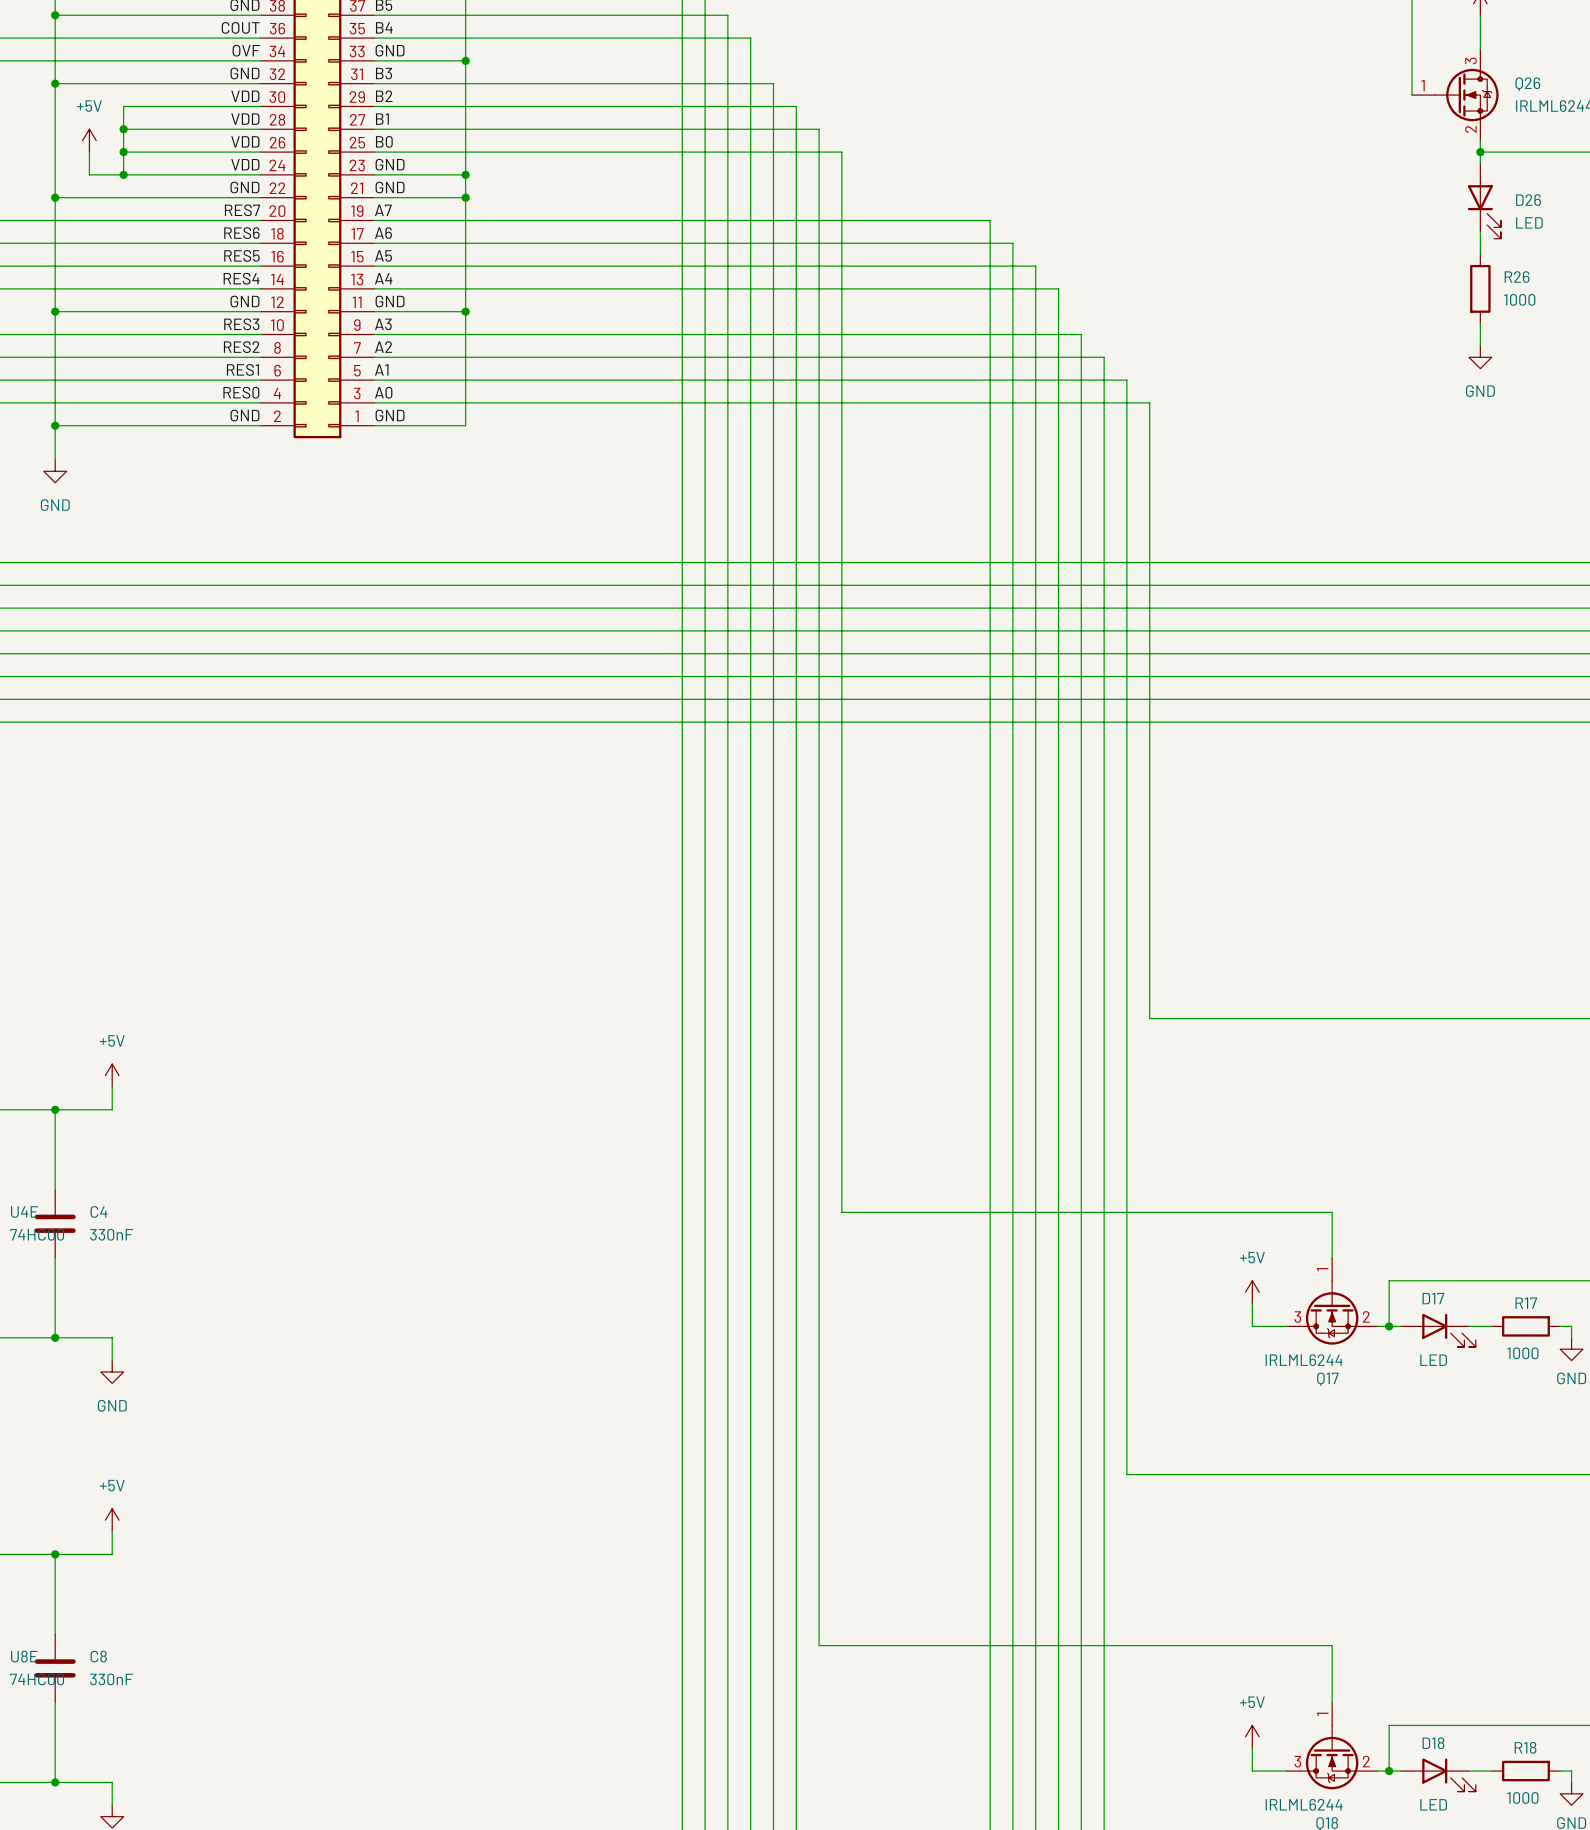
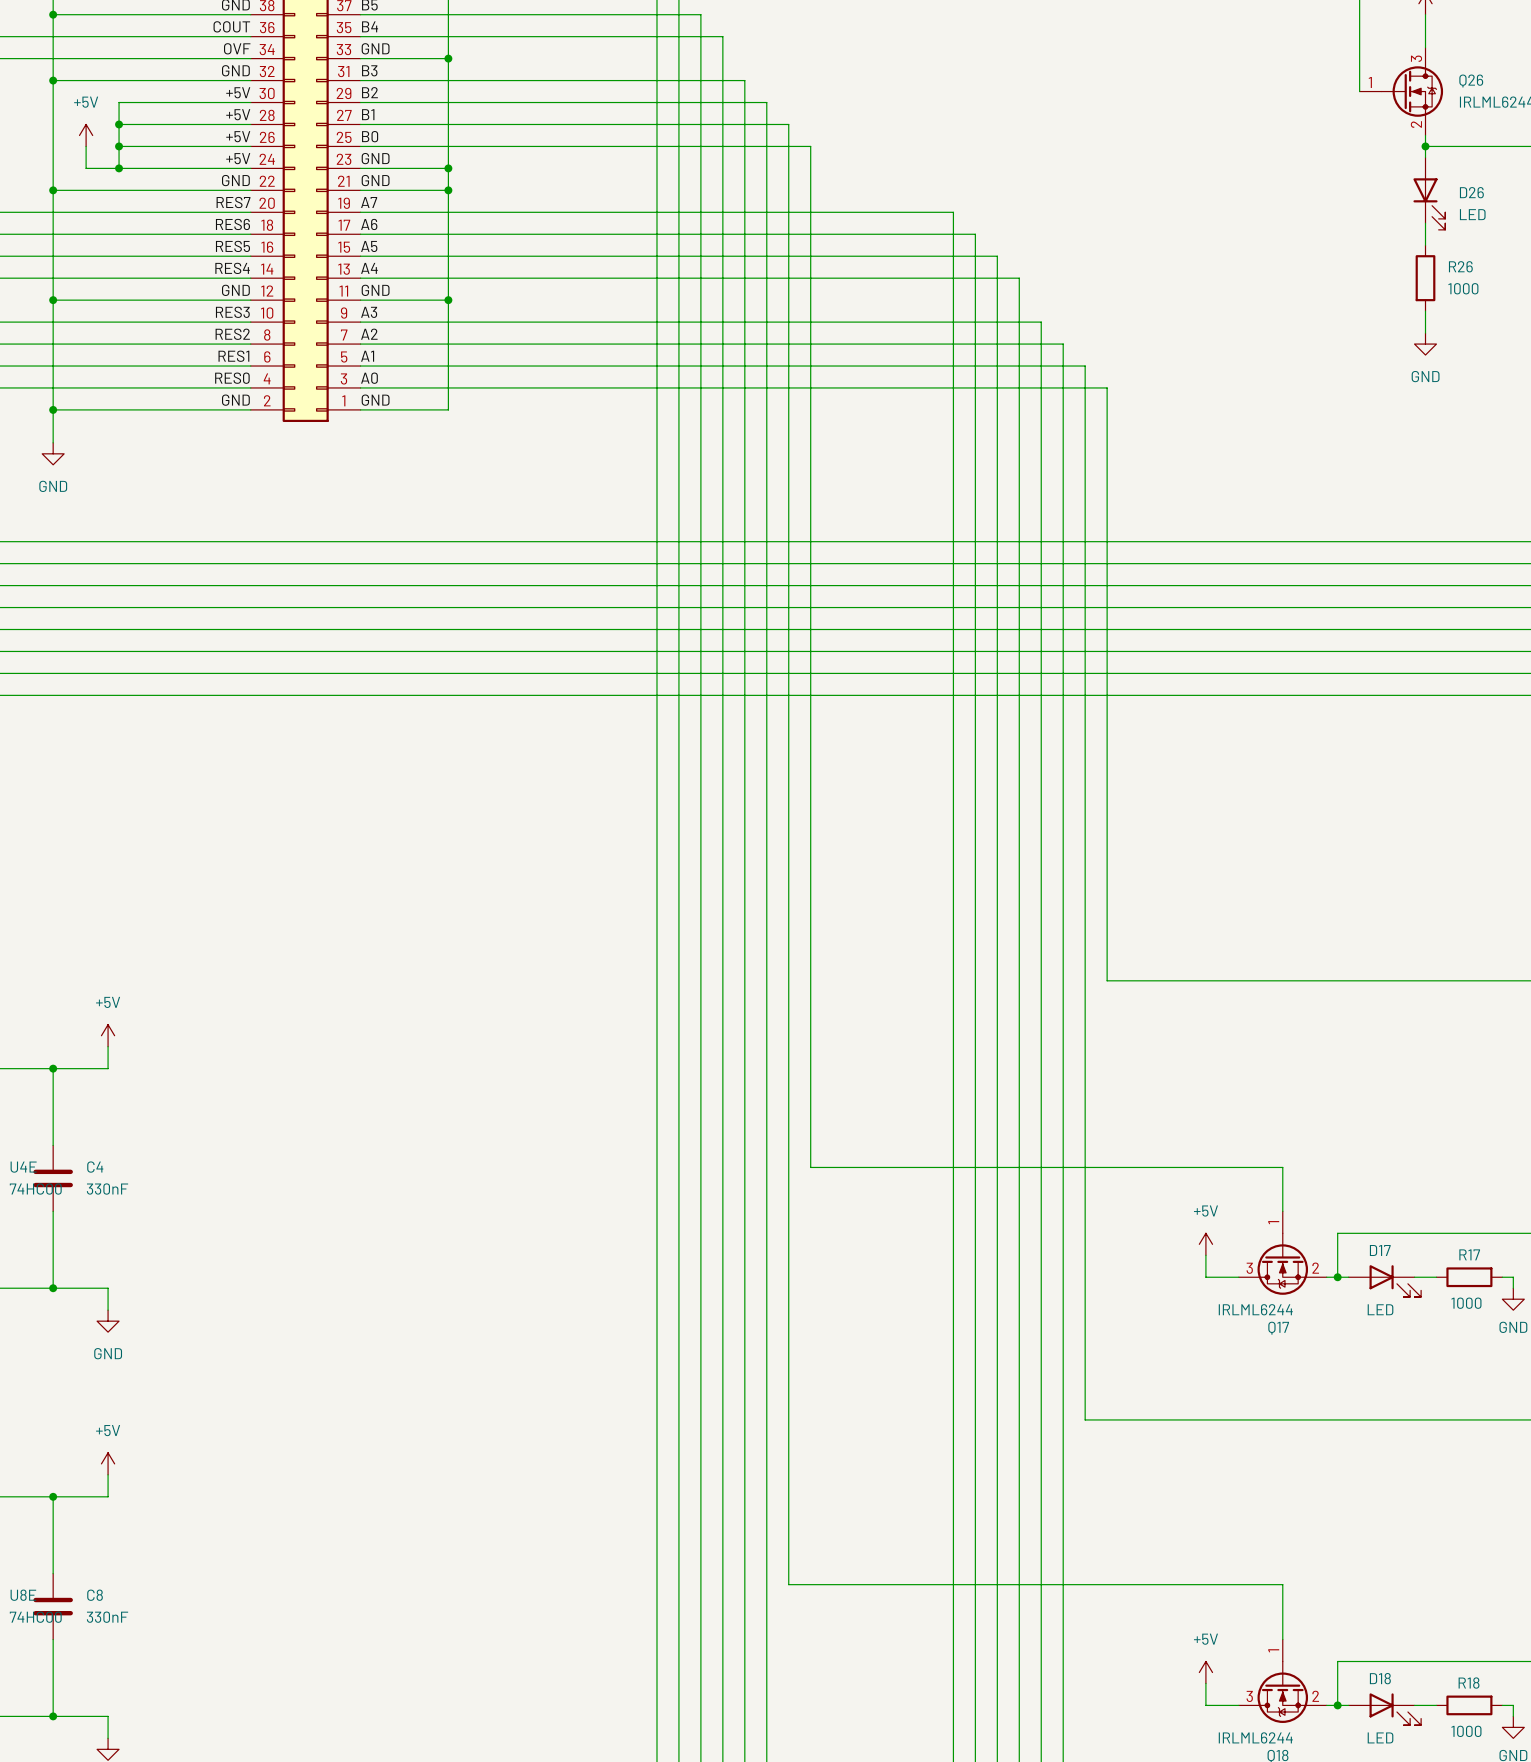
label: VDD (245, 96) -> +5V (238, 92)
label: VDD (245, 119) -> +5V (238, 114)
label: VDD (245, 141) -> +5V (238, 136)
label: VDD (245, 164) -> +5V (238, 158)

